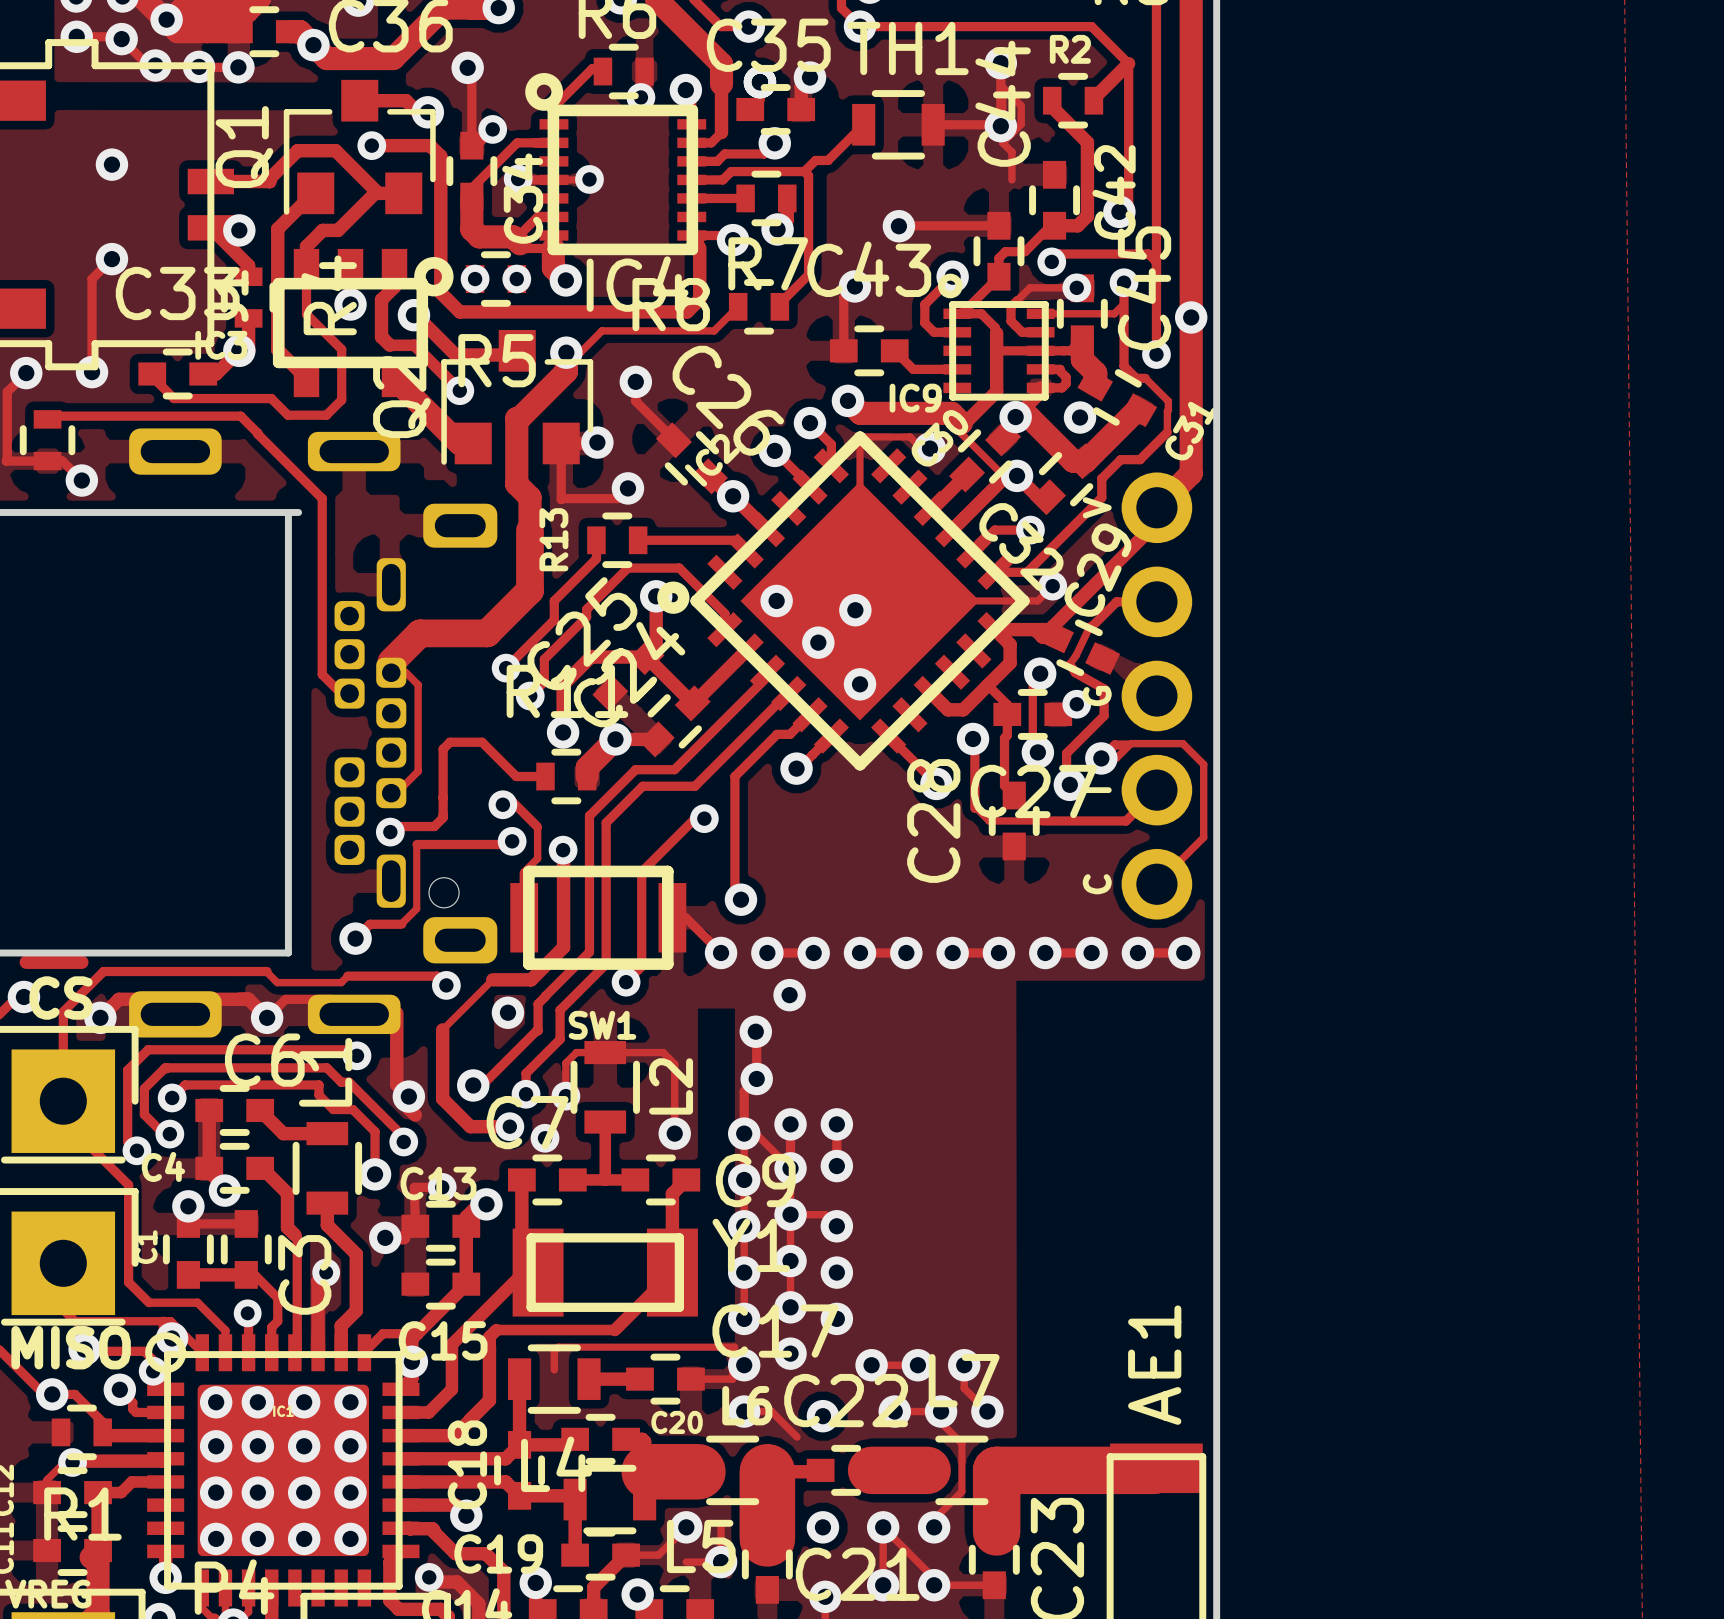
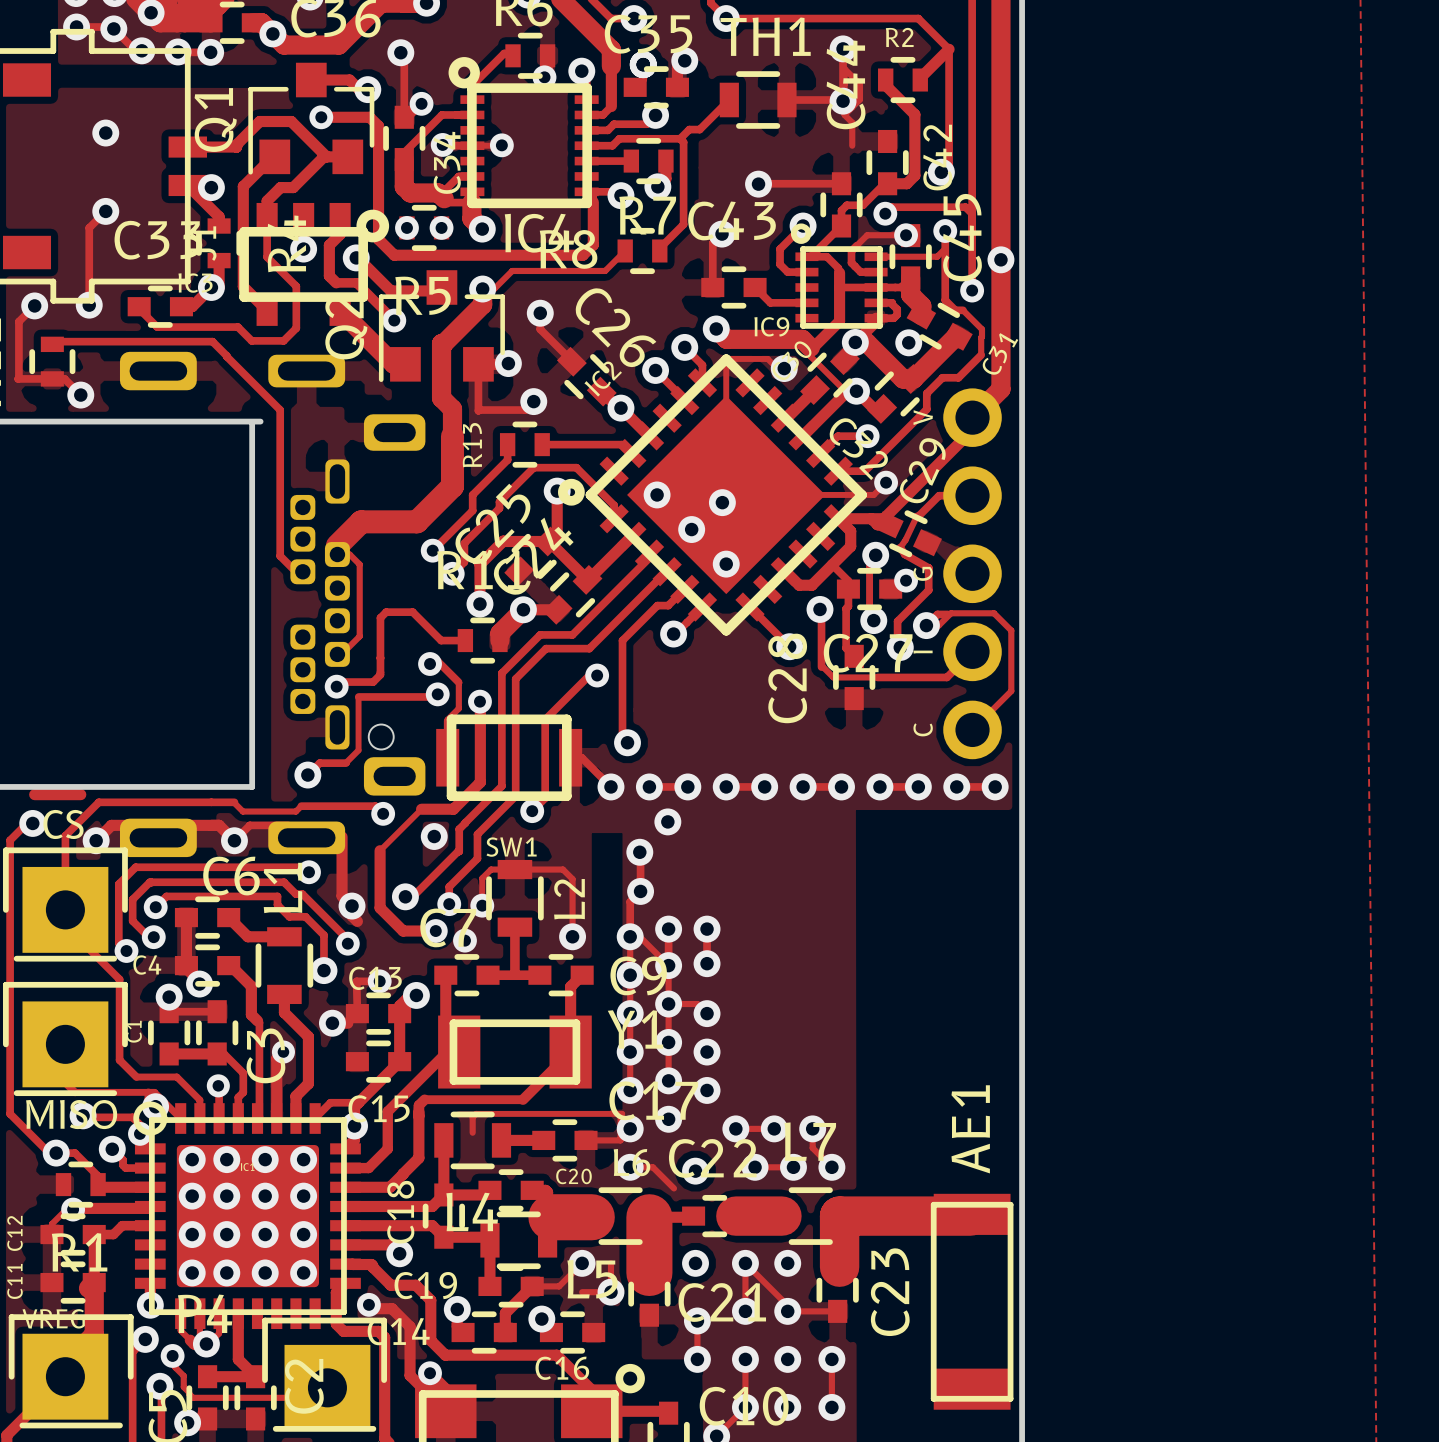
track: (941, 1411) (941, 1422) (961, 1443) (961, 1491) (934, 1519) (934, 1527) -> none

